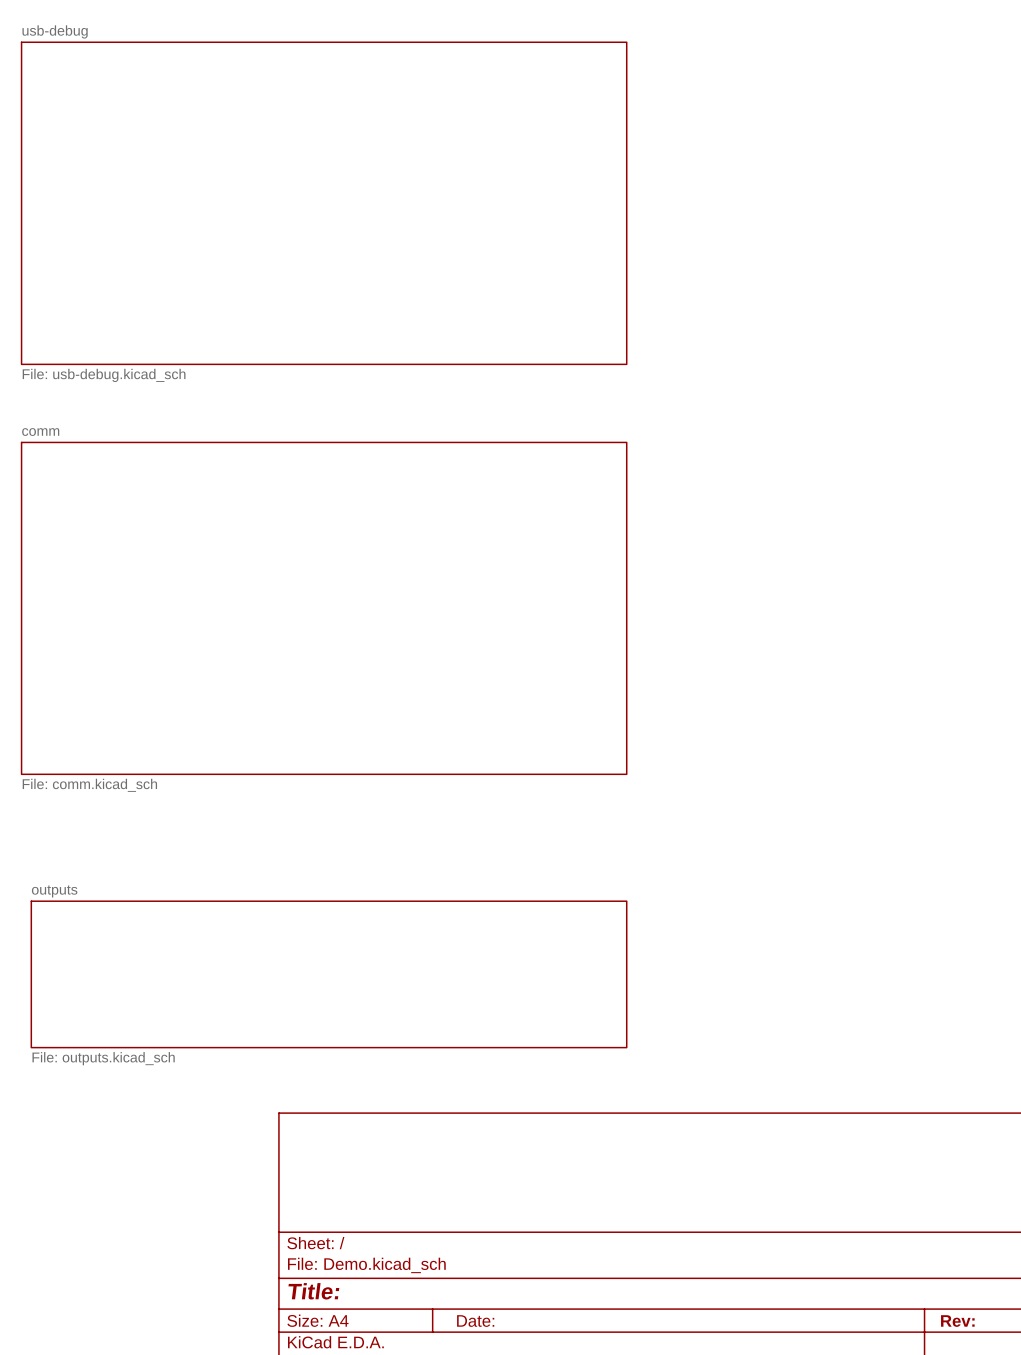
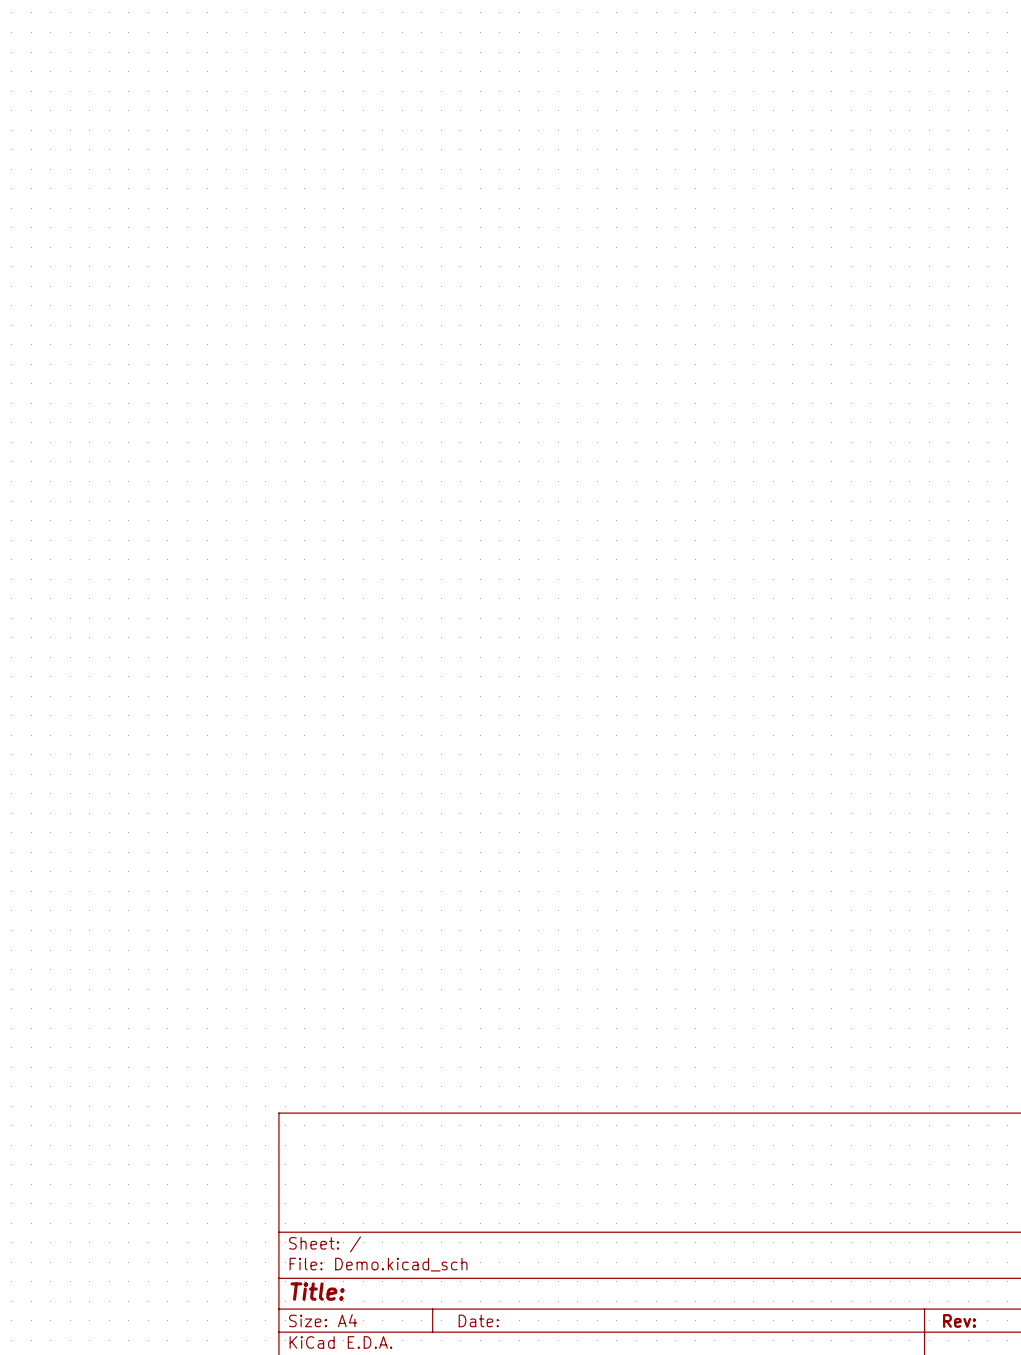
sheet usb-debug: File: usb-debug.kicad_sch (324, 203) -> none
sheet comm: File: comm.kicad_sch (324, 608) -> none
sheet outputs: File: outputs.kicad_sch (329, 974) -> none

